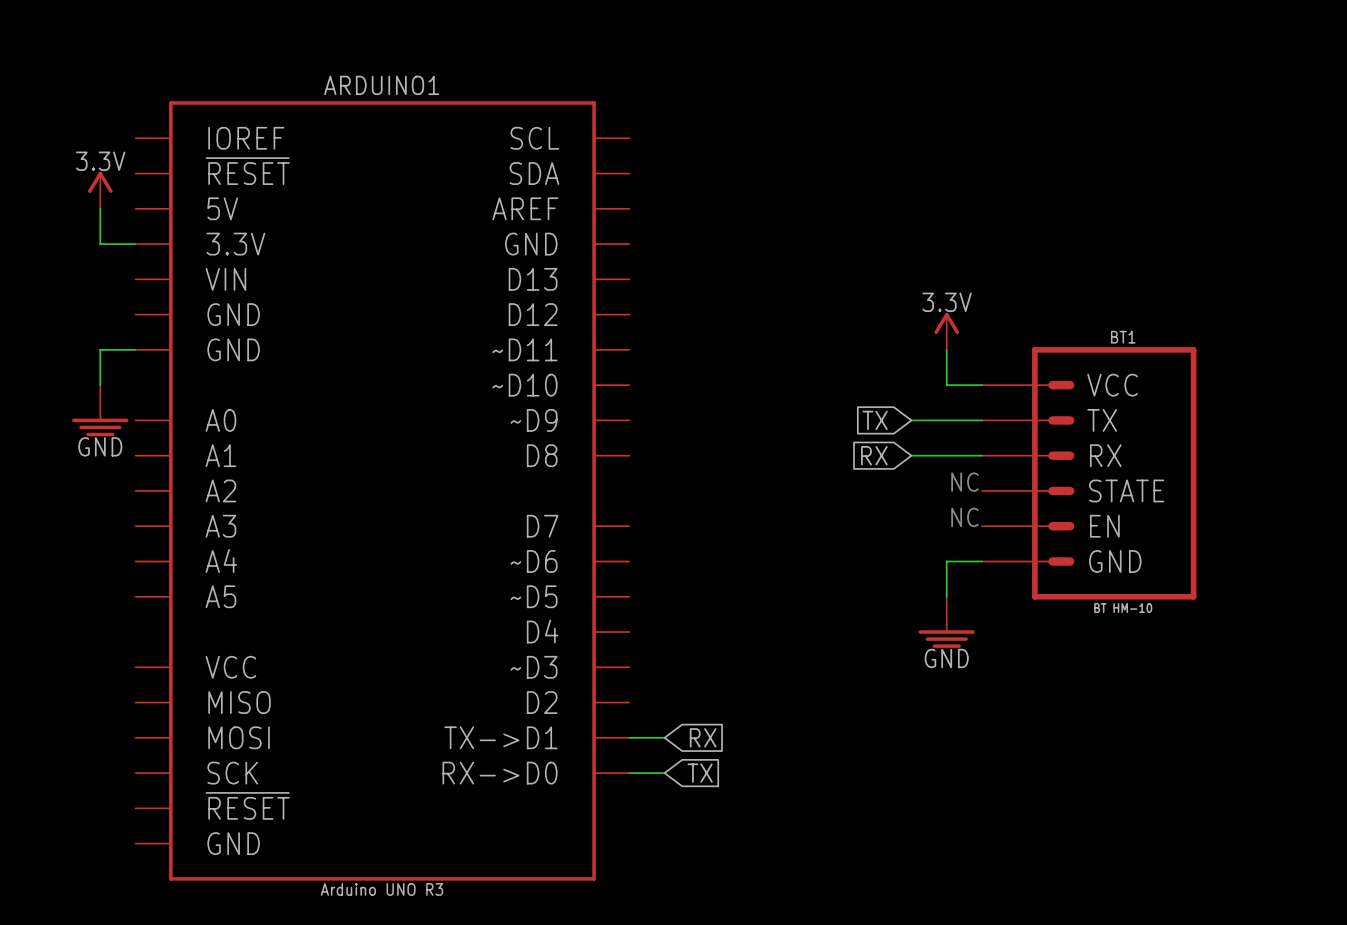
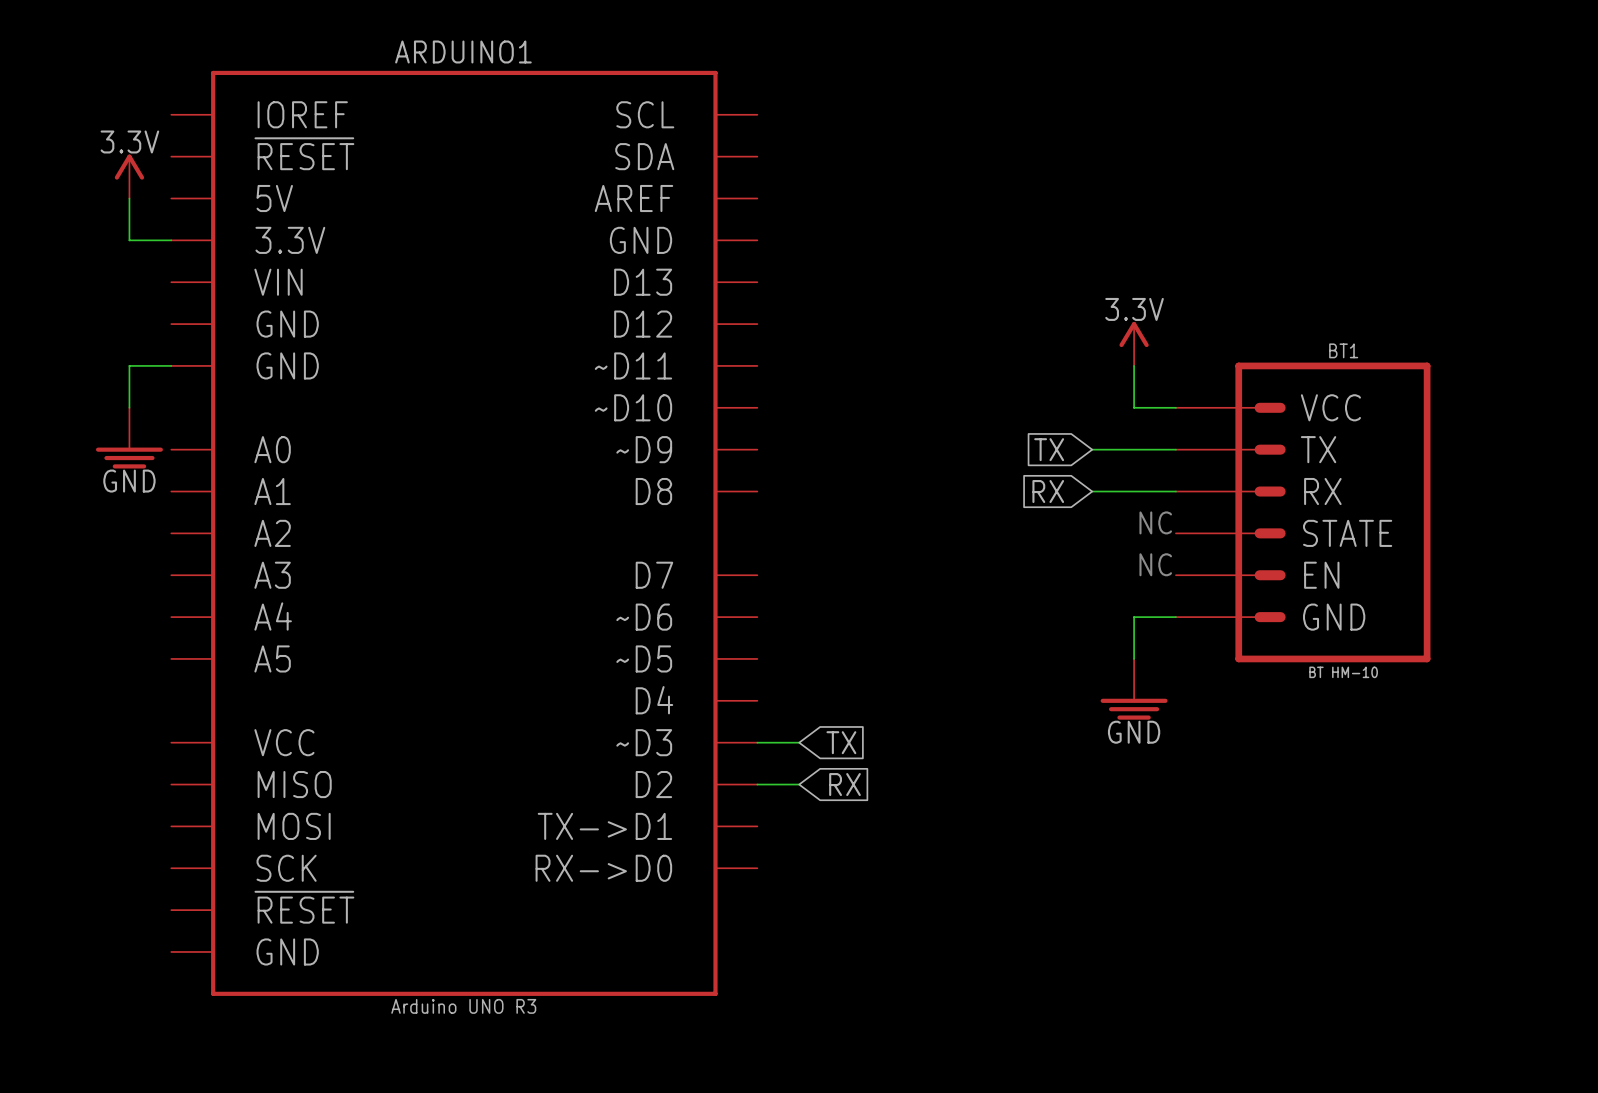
wire: (629, 737) (664, 737) -> (757, 784) (799, 784)
global label position: RX (703, 737) -> RX (844, 784)
wire: (629, 773) (664, 773) -> (757, 742) (799, 742)
global label position: TX (700, 773) -> TX (841, 742)

